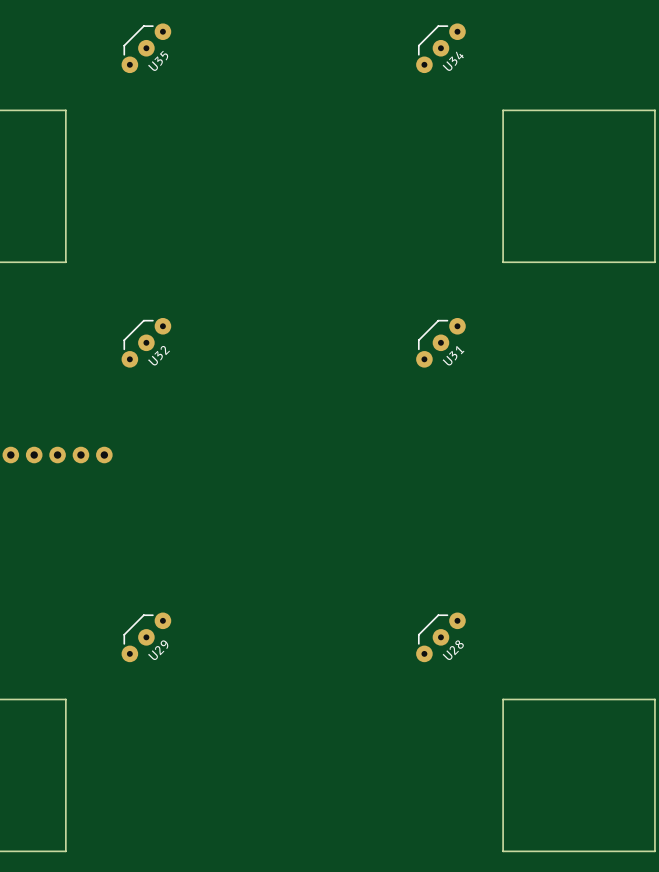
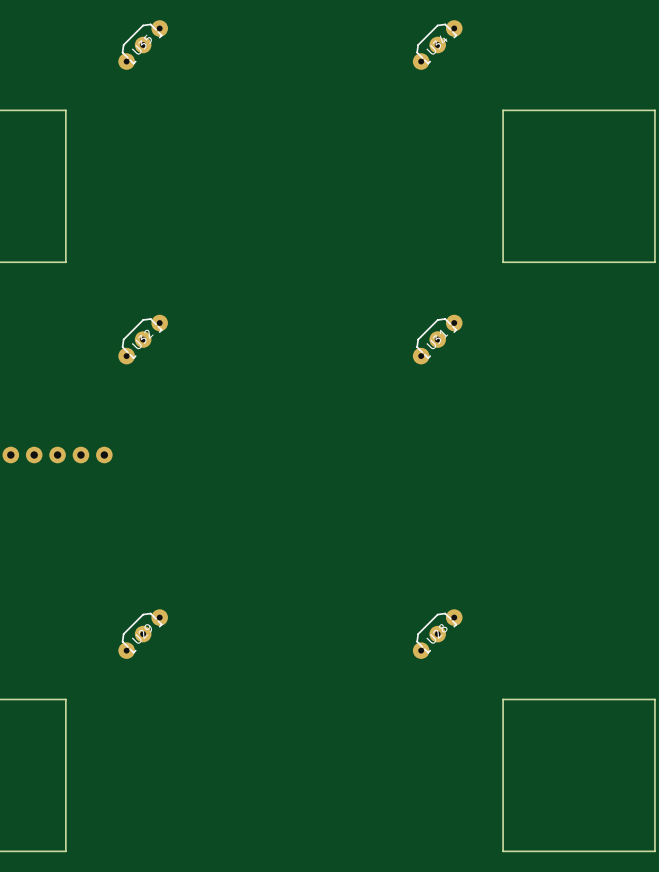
U35 footprint: [121, 23, 172, 74] -> [118, 20, 168, 70]
U34 footprint: [416, 23, 466, 74] -> [412, 20, 463, 70]
U32 footprint: [121, 317, 172, 368] -> [118, 314, 168, 365]
U31 footprint: [416, 317, 466, 368] -> [412, 314, 463, 365]
U29 footprint: [121, 612, 172, 663] -> [118, 609, 168, 659]
U28 footprint: [416, 612, 466, 663] -> [412, 609, 463, 659]

